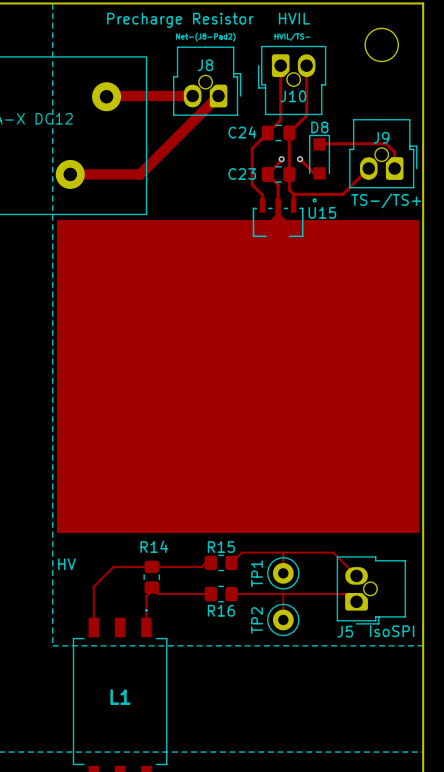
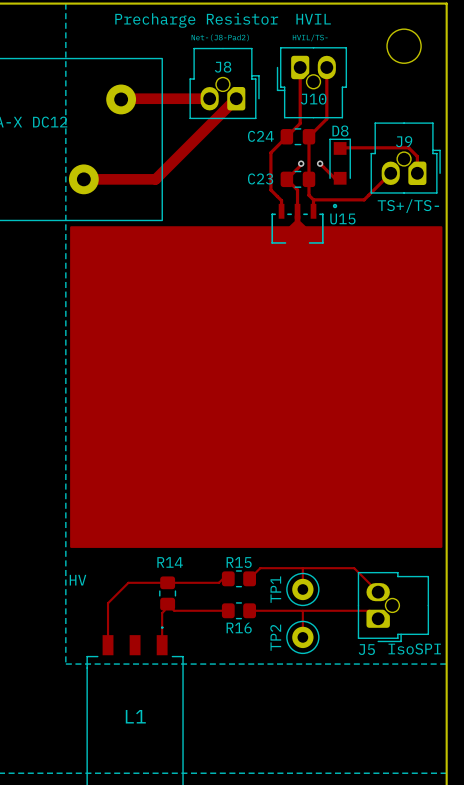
J9 value: TS-/TS+ (386, 200) -> TS+/TS- (408, 206)

